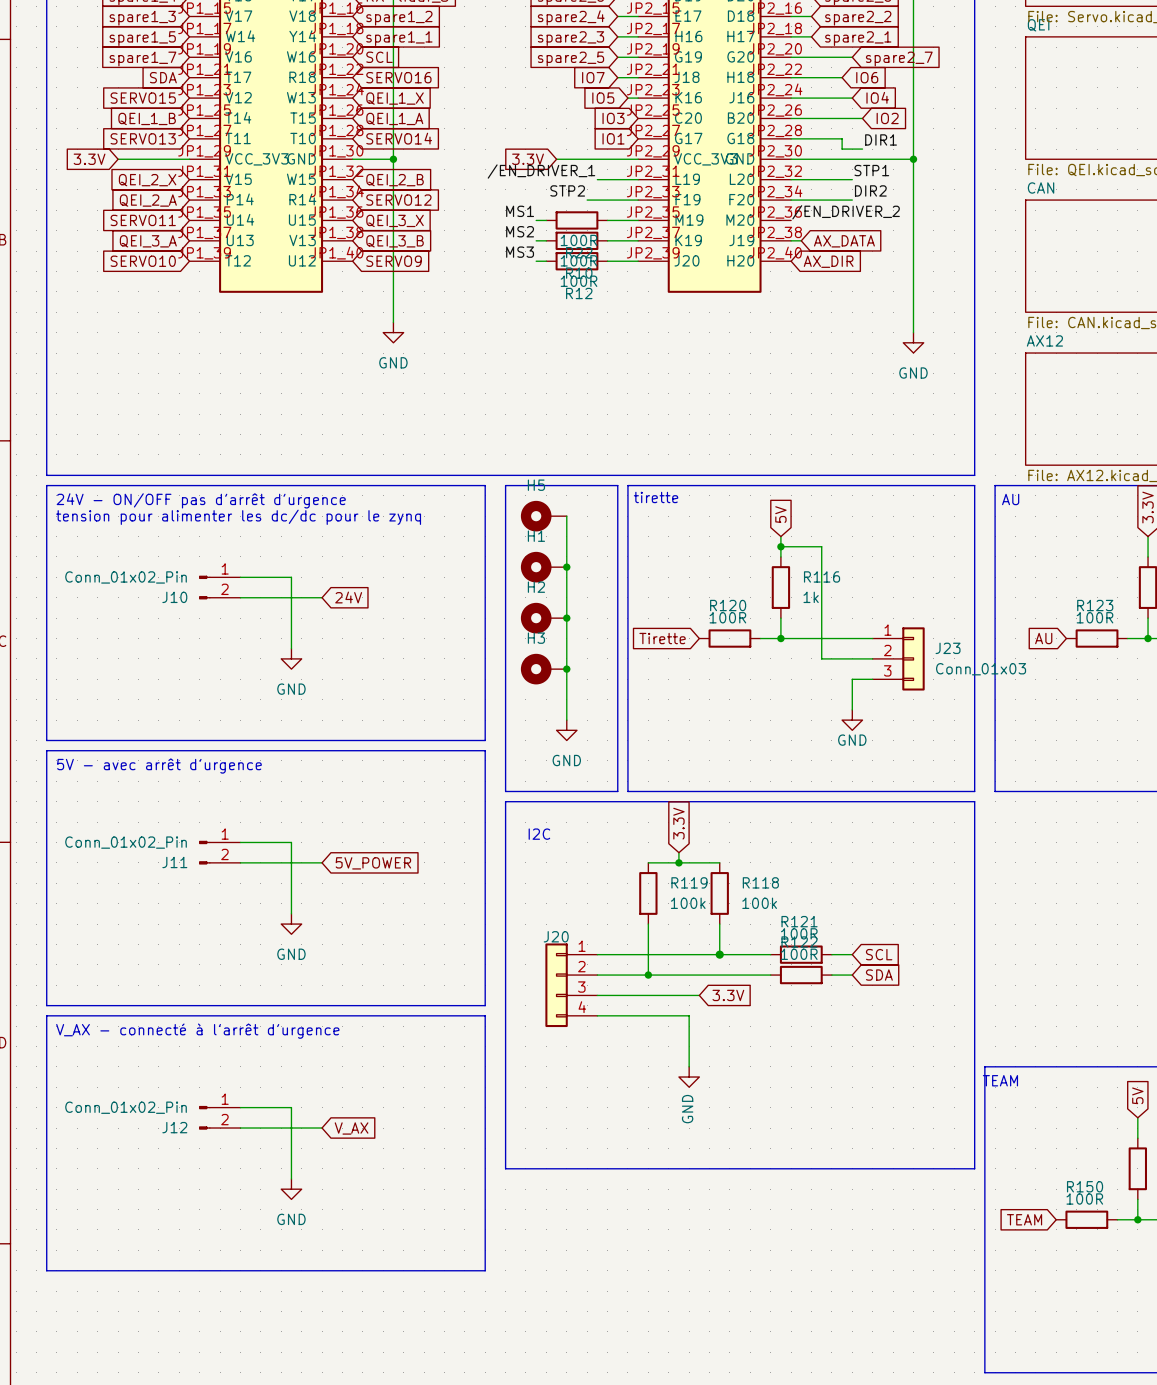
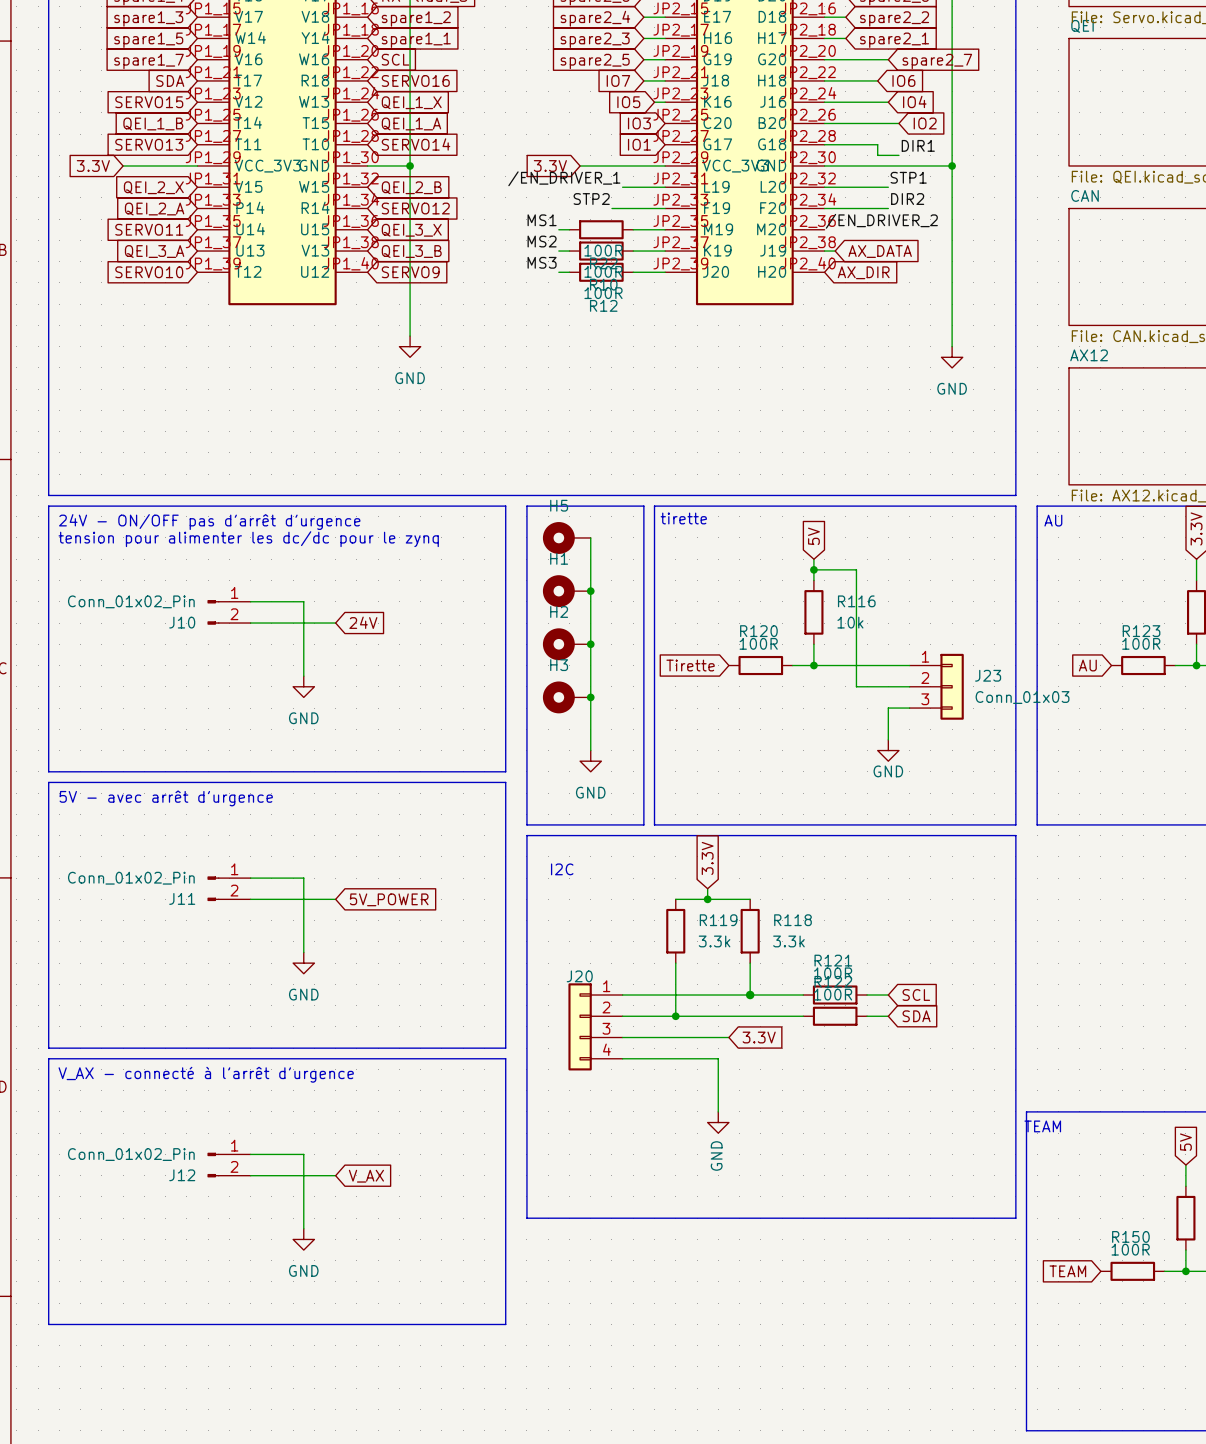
R116 value: 1k (811, 597) -> 10k (850, 622)
R119 value: 100k (688, 903) -> 3.3k (714, 941)
R118 value: 100k (759, 903) -> 3.3k (788, 941)

